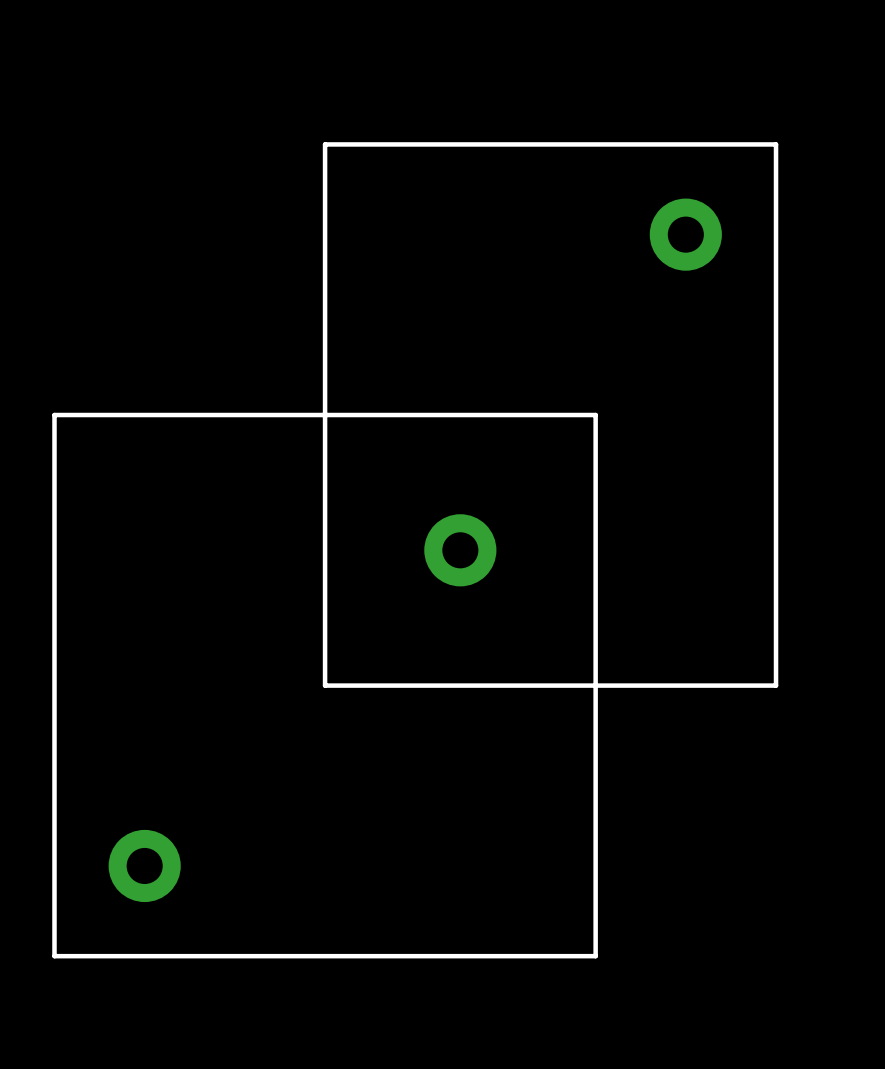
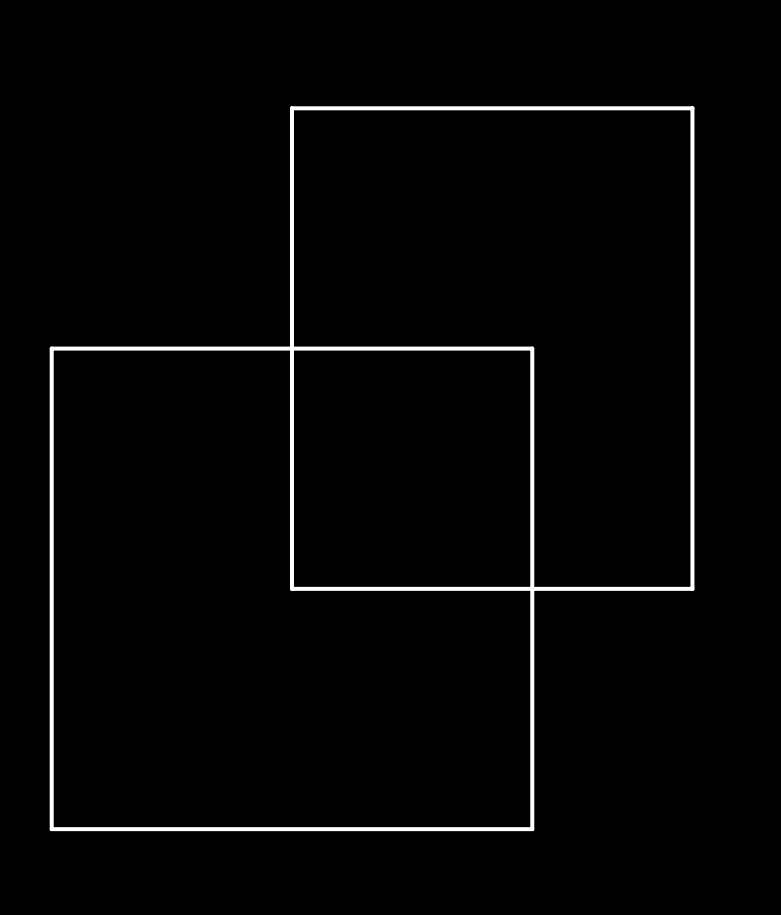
part: (685, 234) -> none
part: (460, 550) -> none
part: (144, 865) -> none

